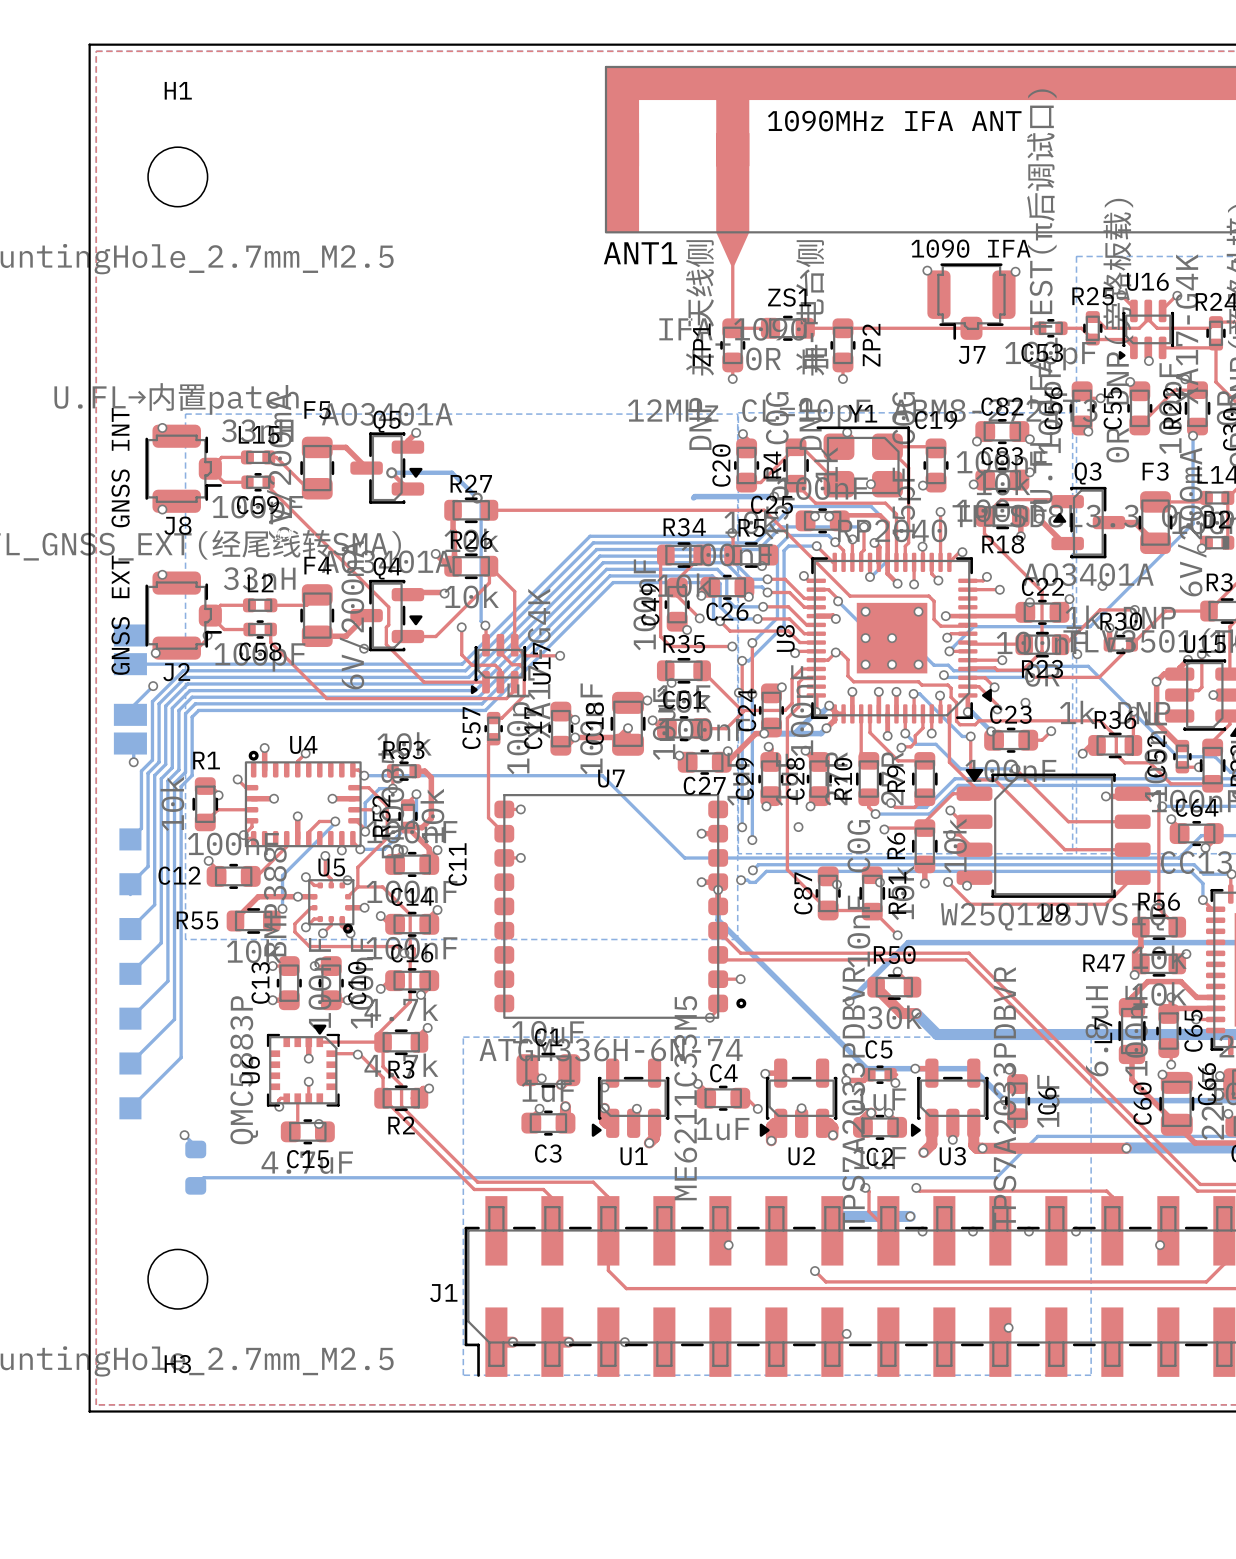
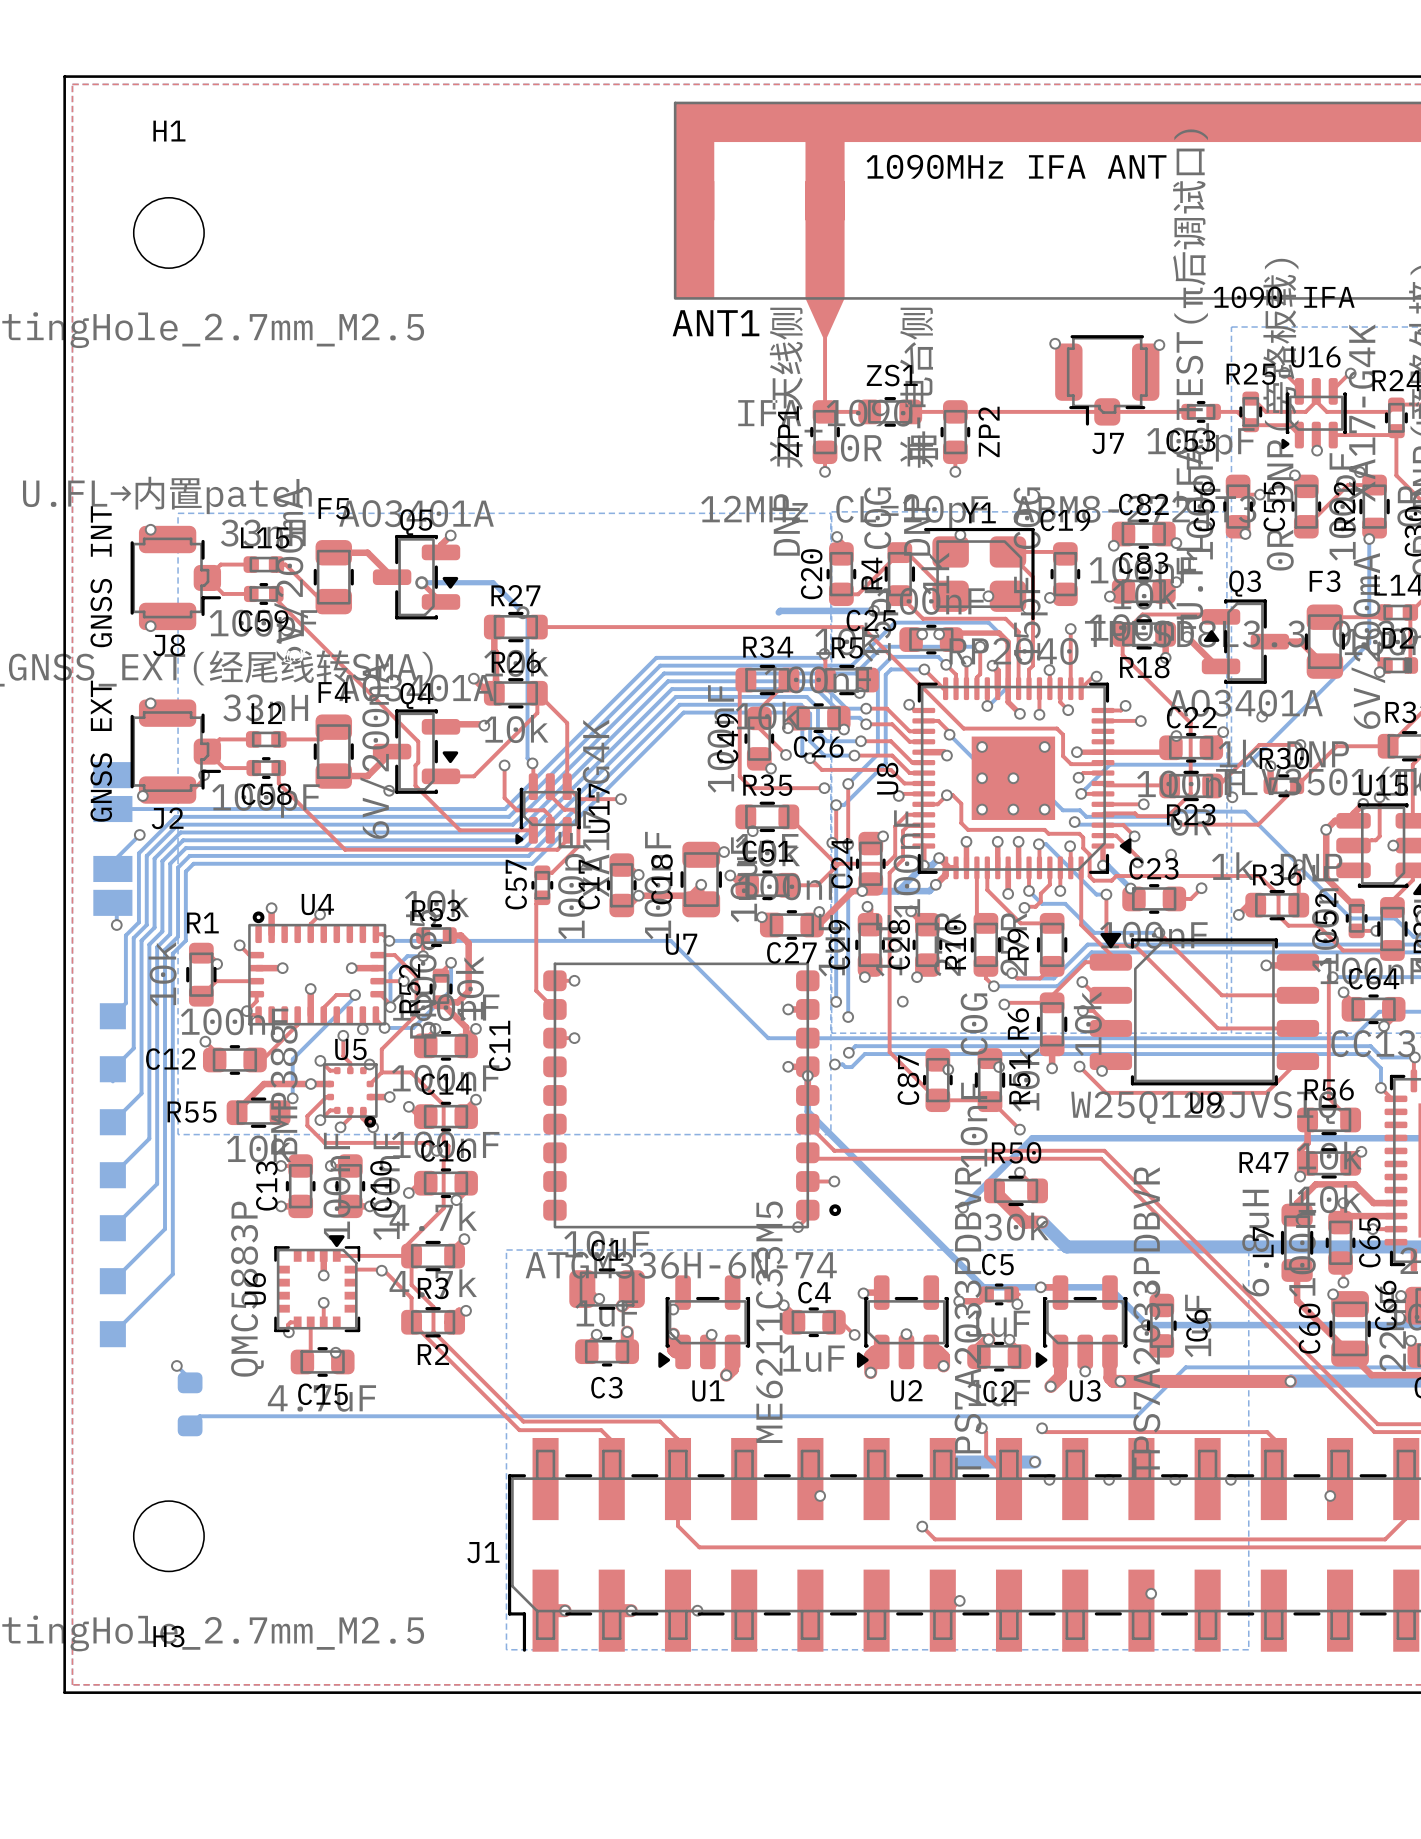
text position: 1090 IFA (971, 248) -> 1090 IFA (1284, 297)

